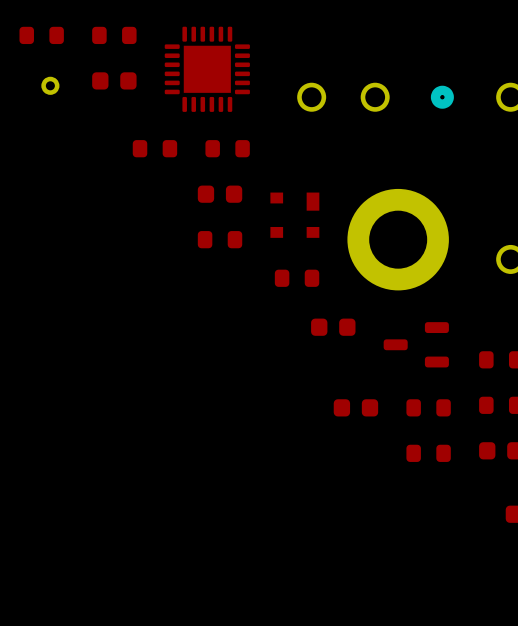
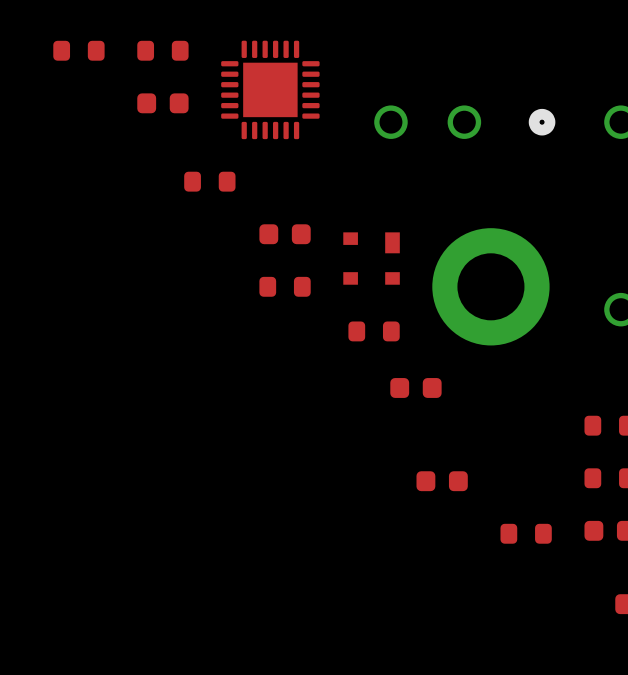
part: (50, 85) -> none
part: (227, 148) -> none
part: (416, 344) -> none
part: (428, 407) -> none

